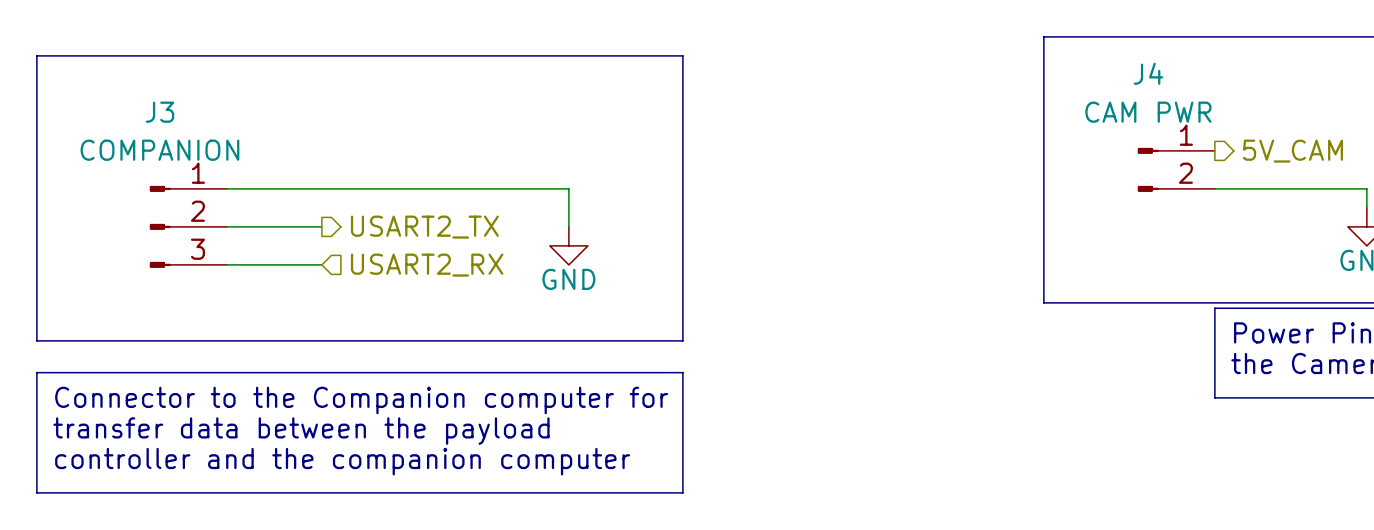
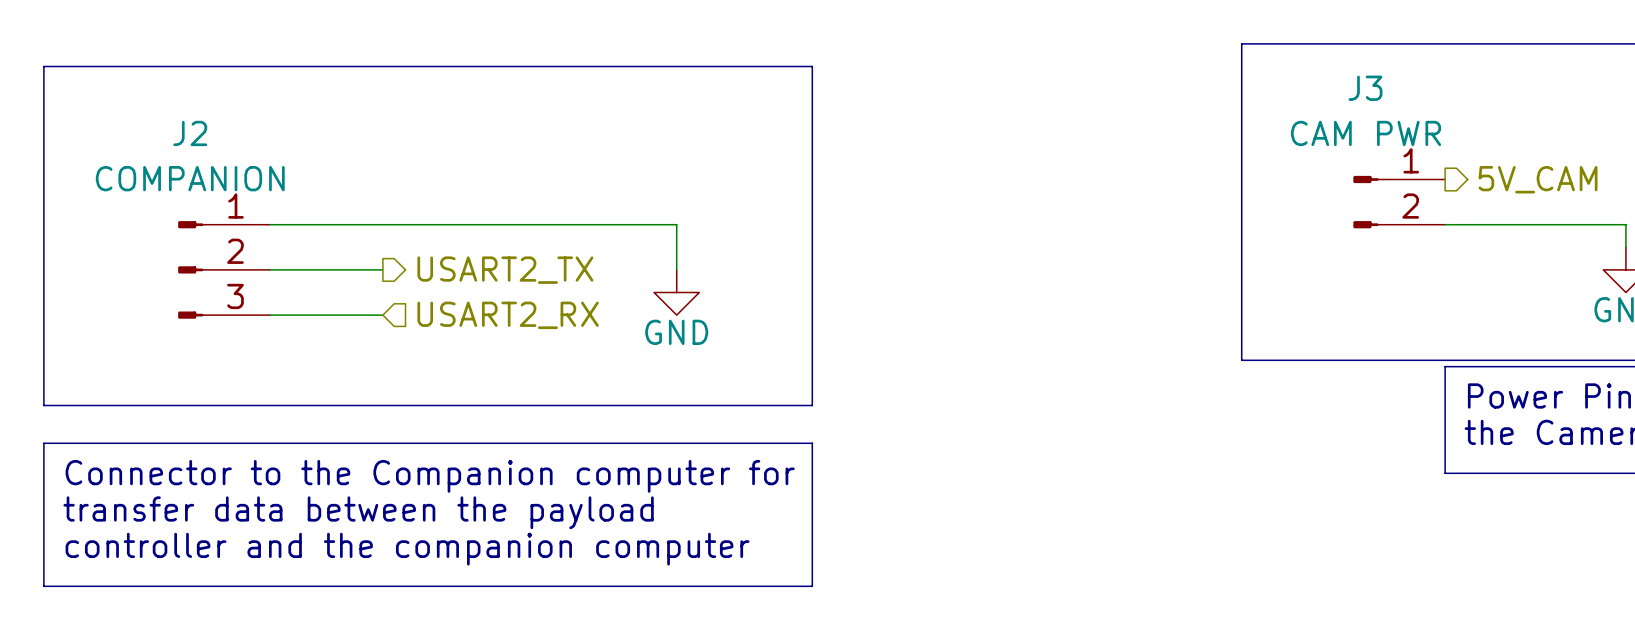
J4 name: J4 (1148, 73) -> J3 (1365, 88)
J3 name: J3 (159, 112) -> J2 (190, 133)

